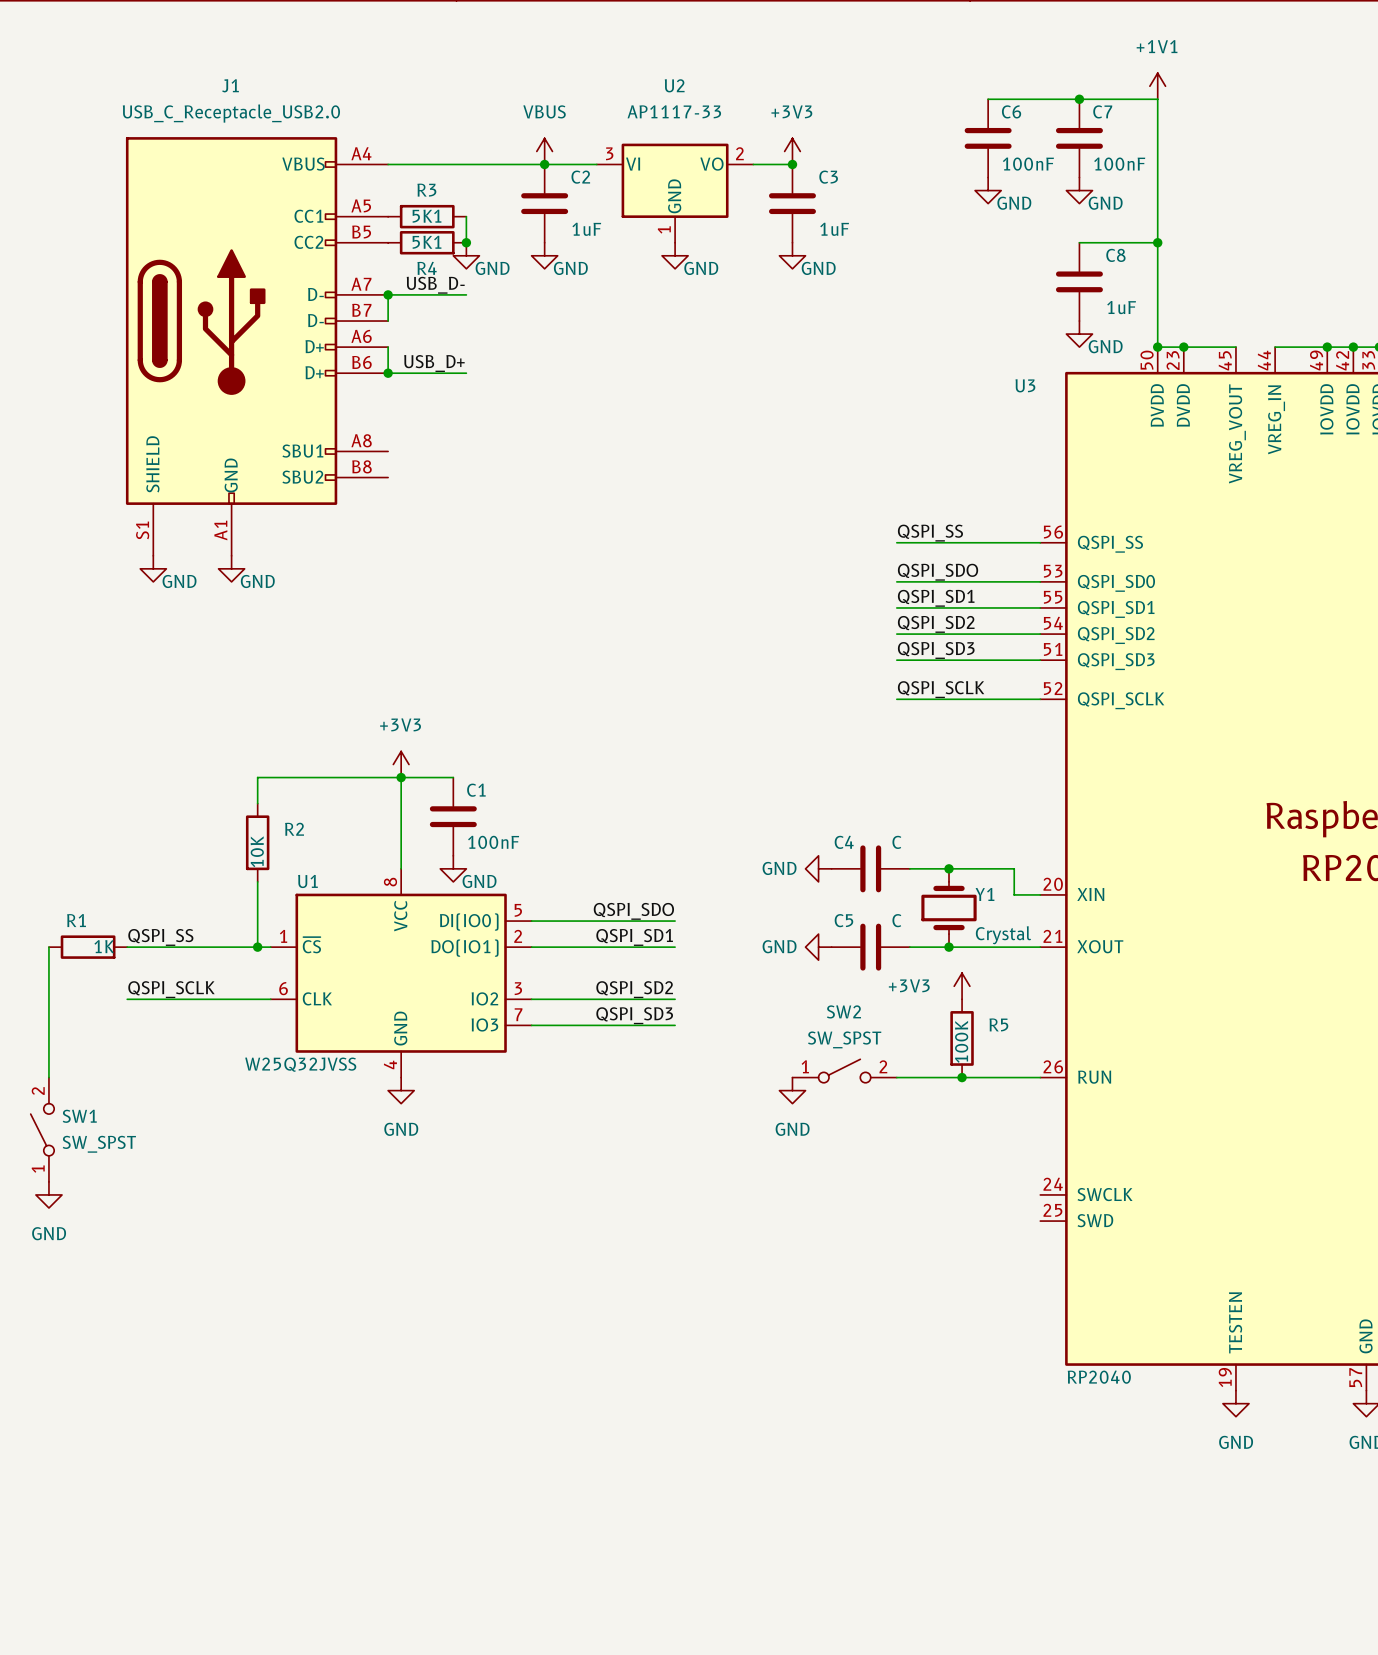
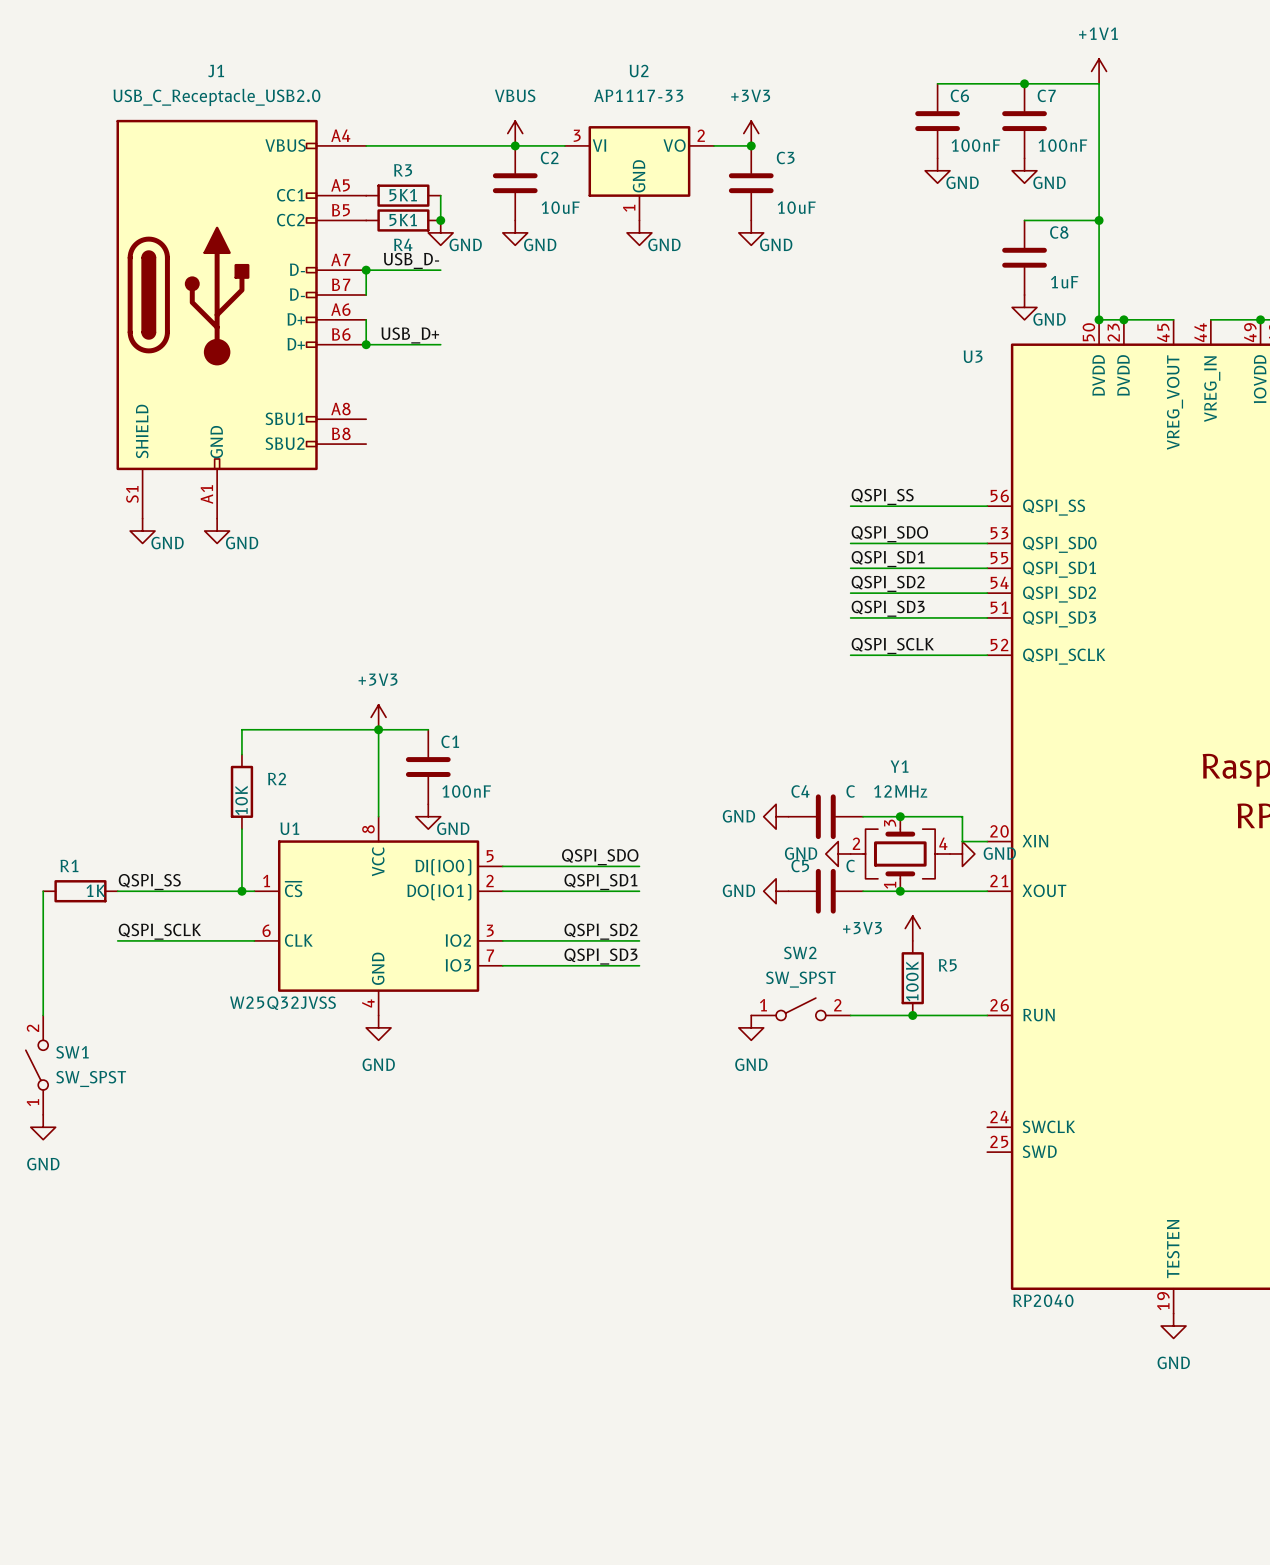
C2 value: 1uF (586, 229) -> 10uF (560, 207)
C3 value: 1uF (834, 229) -> 10uF (796, 207)
Y1 symbol: [921, 868, 977, 948] -> [850, 816, 951, 892]
Y1 name position: Y1 (985, 894) -> Y1 (899, 766)
power symbol: none -> GND (838, 853)
power symbol: none -> GND (962, 853)
Y1 value: Crystal (1003, 935) -> 12MHz (900, 791)

